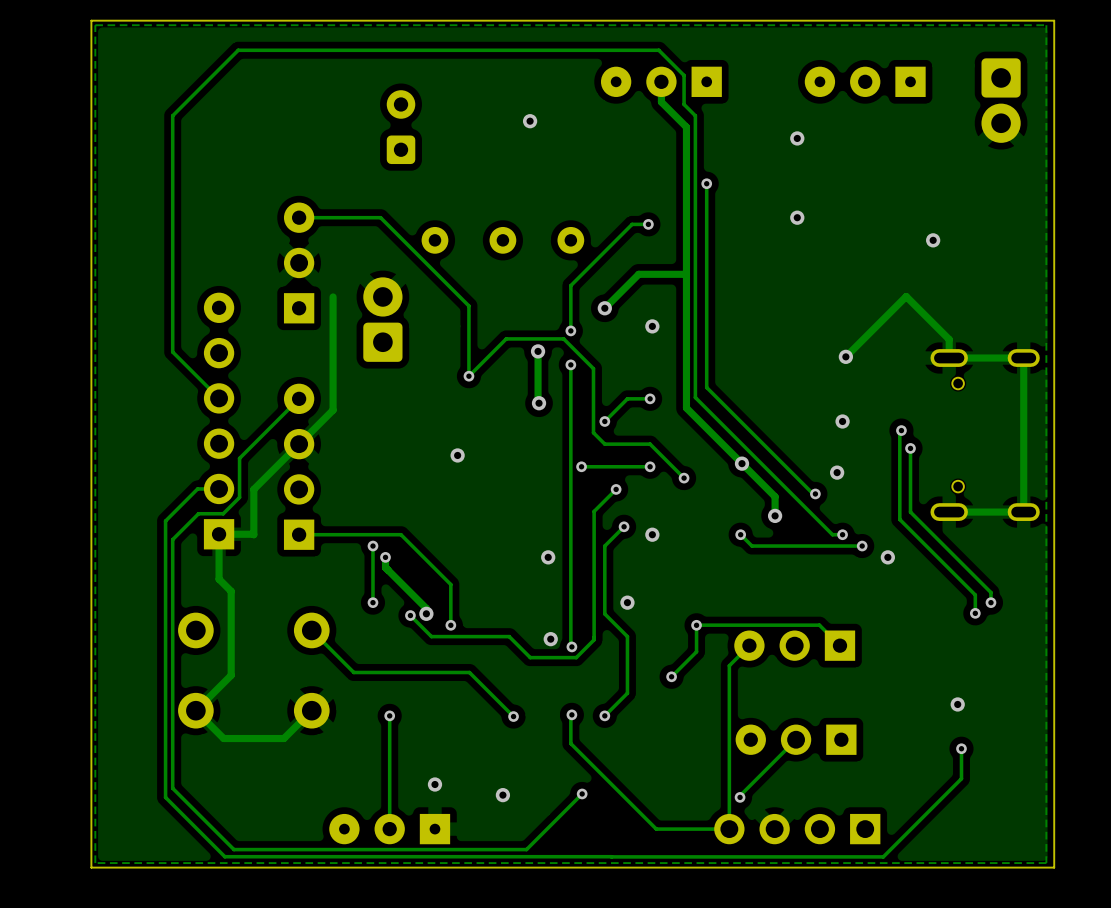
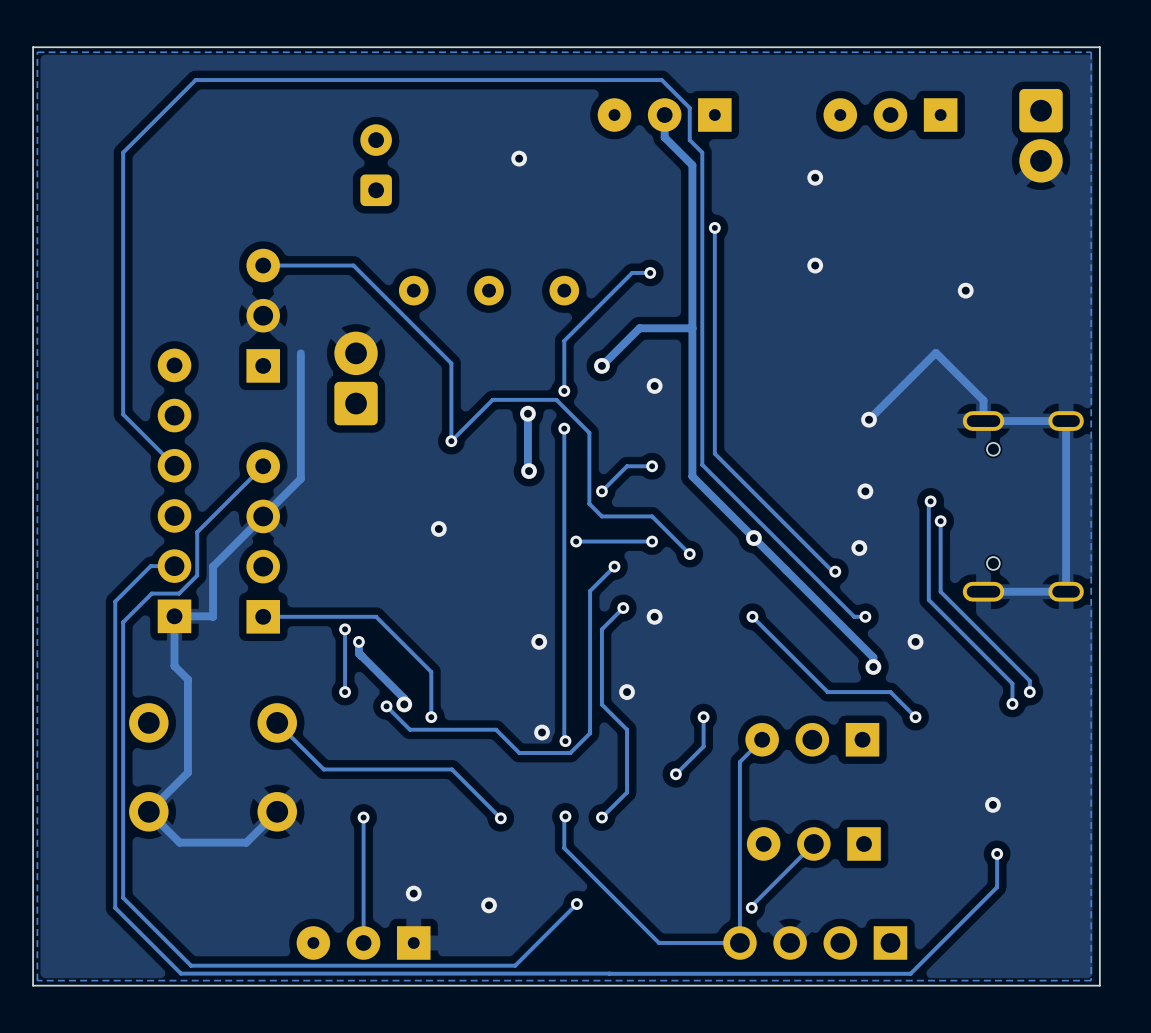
track: (775, 496) (775, 515) -> (790, 574) (873, 657) (873, 666)
via position: (775, 515) -> (873, 666)
track: (862, 546) (752, 546) -> (915, 717) (890, 692) (827, 692) (765, 629)
via position: (862, 546) -> (915, 717)
track: (696, 625) (819, 625) (839, 645) -> none

